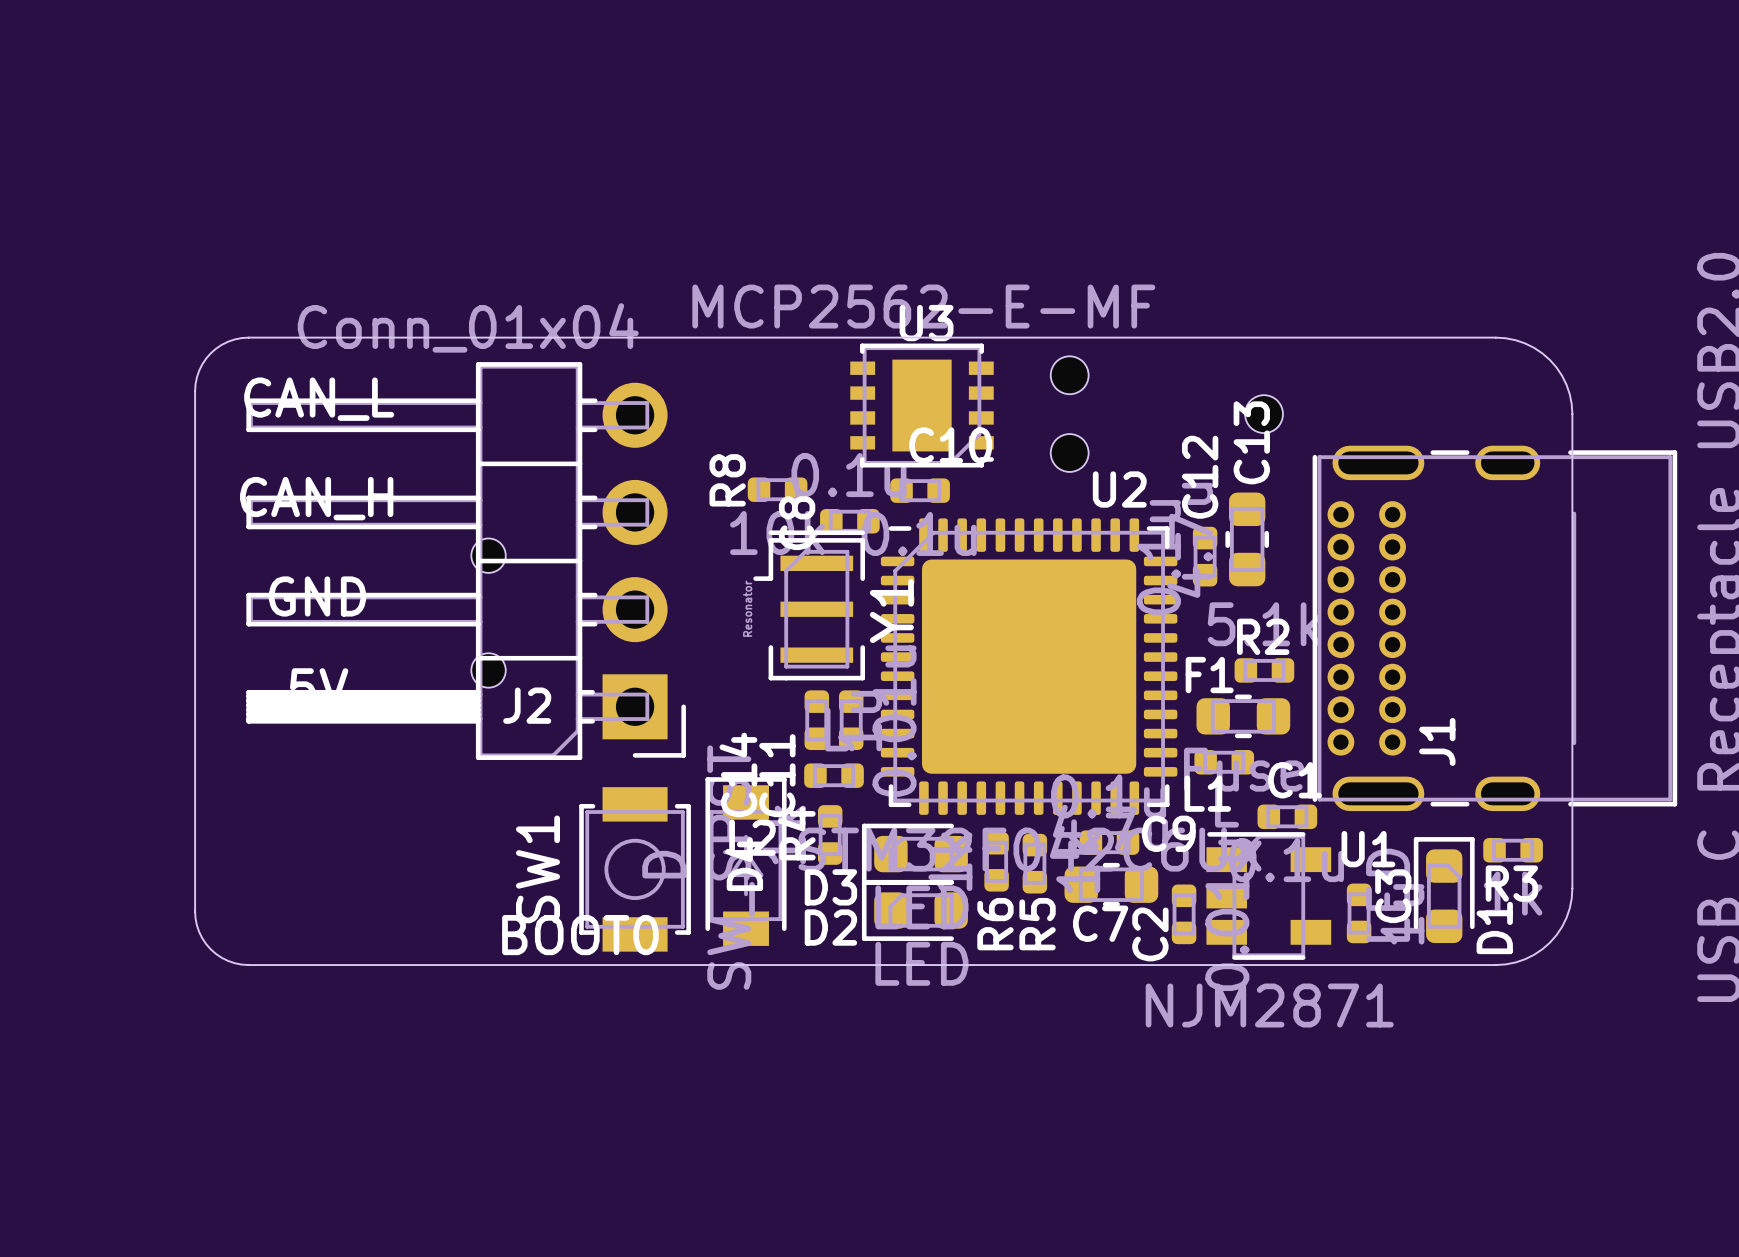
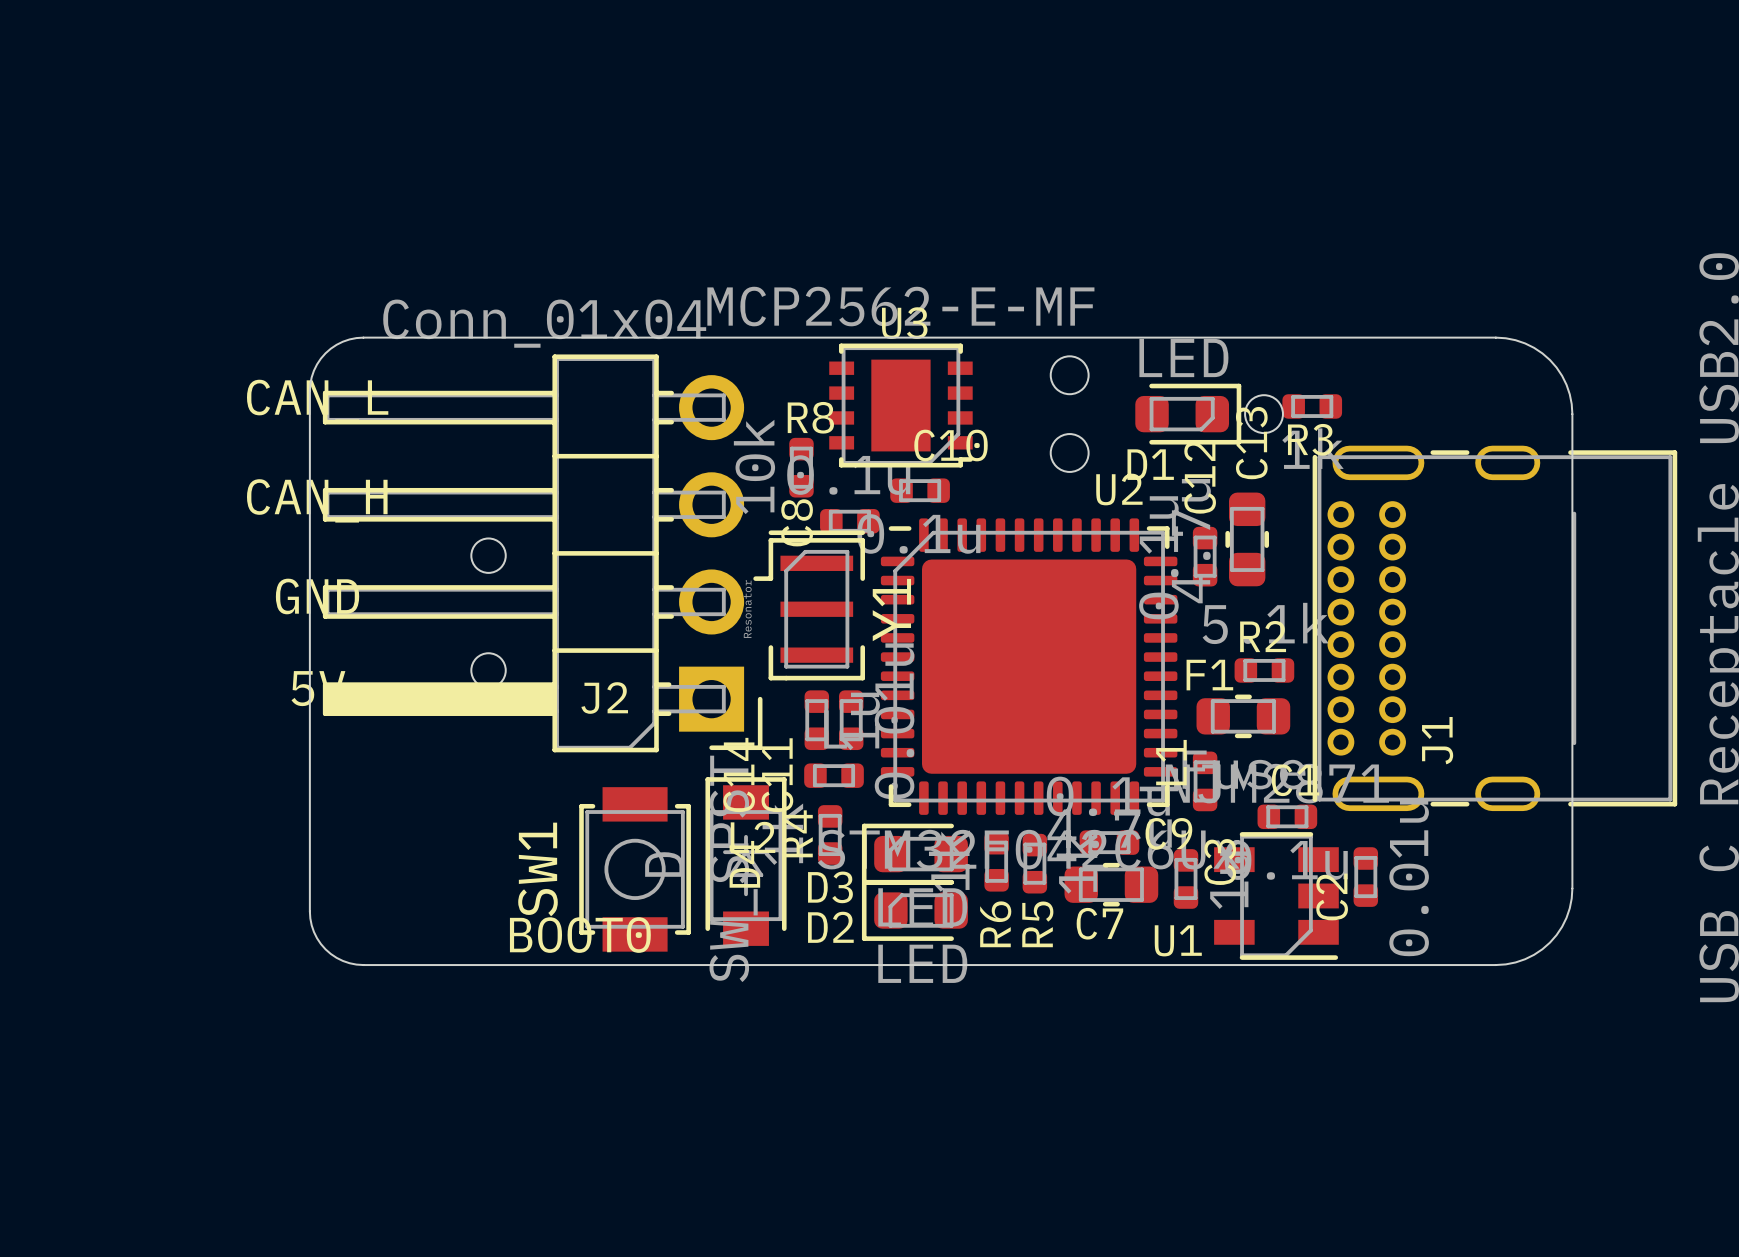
board edge: (363, 337) (248, 337) (234, 339) (221, 344) (206, 358) (196, 377) (195, 391) (195, 911) (196, 925) (202, 938) (210, 949) (221, 957) (234, 963) (248, 965) (363, 965) -> (363, 337) (342, 341) (325, 353) (313, 370) (309, 391) (310, 918) (317, 938) (330, 953) (342, 960) (363, 965)
U3 position: (922, 405) -> (901, 405)
R8 rotation: 0° (777, 489) -> 90° clockwise (801, 467)
J2 position: (466, 561) -> (542, 553)
L1 rotation: 0° (1224, 762) -> 90° clockwise (1205, 781)
R3 position: (1513, 850) -> (1312, 406)
D1 rotation: 0° (1444, 890) -> 90° clockwise (1188, 414)
D1 position: (1444, 890) -> (1188, 414)
U1 rotation: 0° (1268, 895) -> 180° (1276, 895)
C3 position: (1359, 913) -> (1185, 878)
C2 position: (1184, 914) -> (1365, 877)

